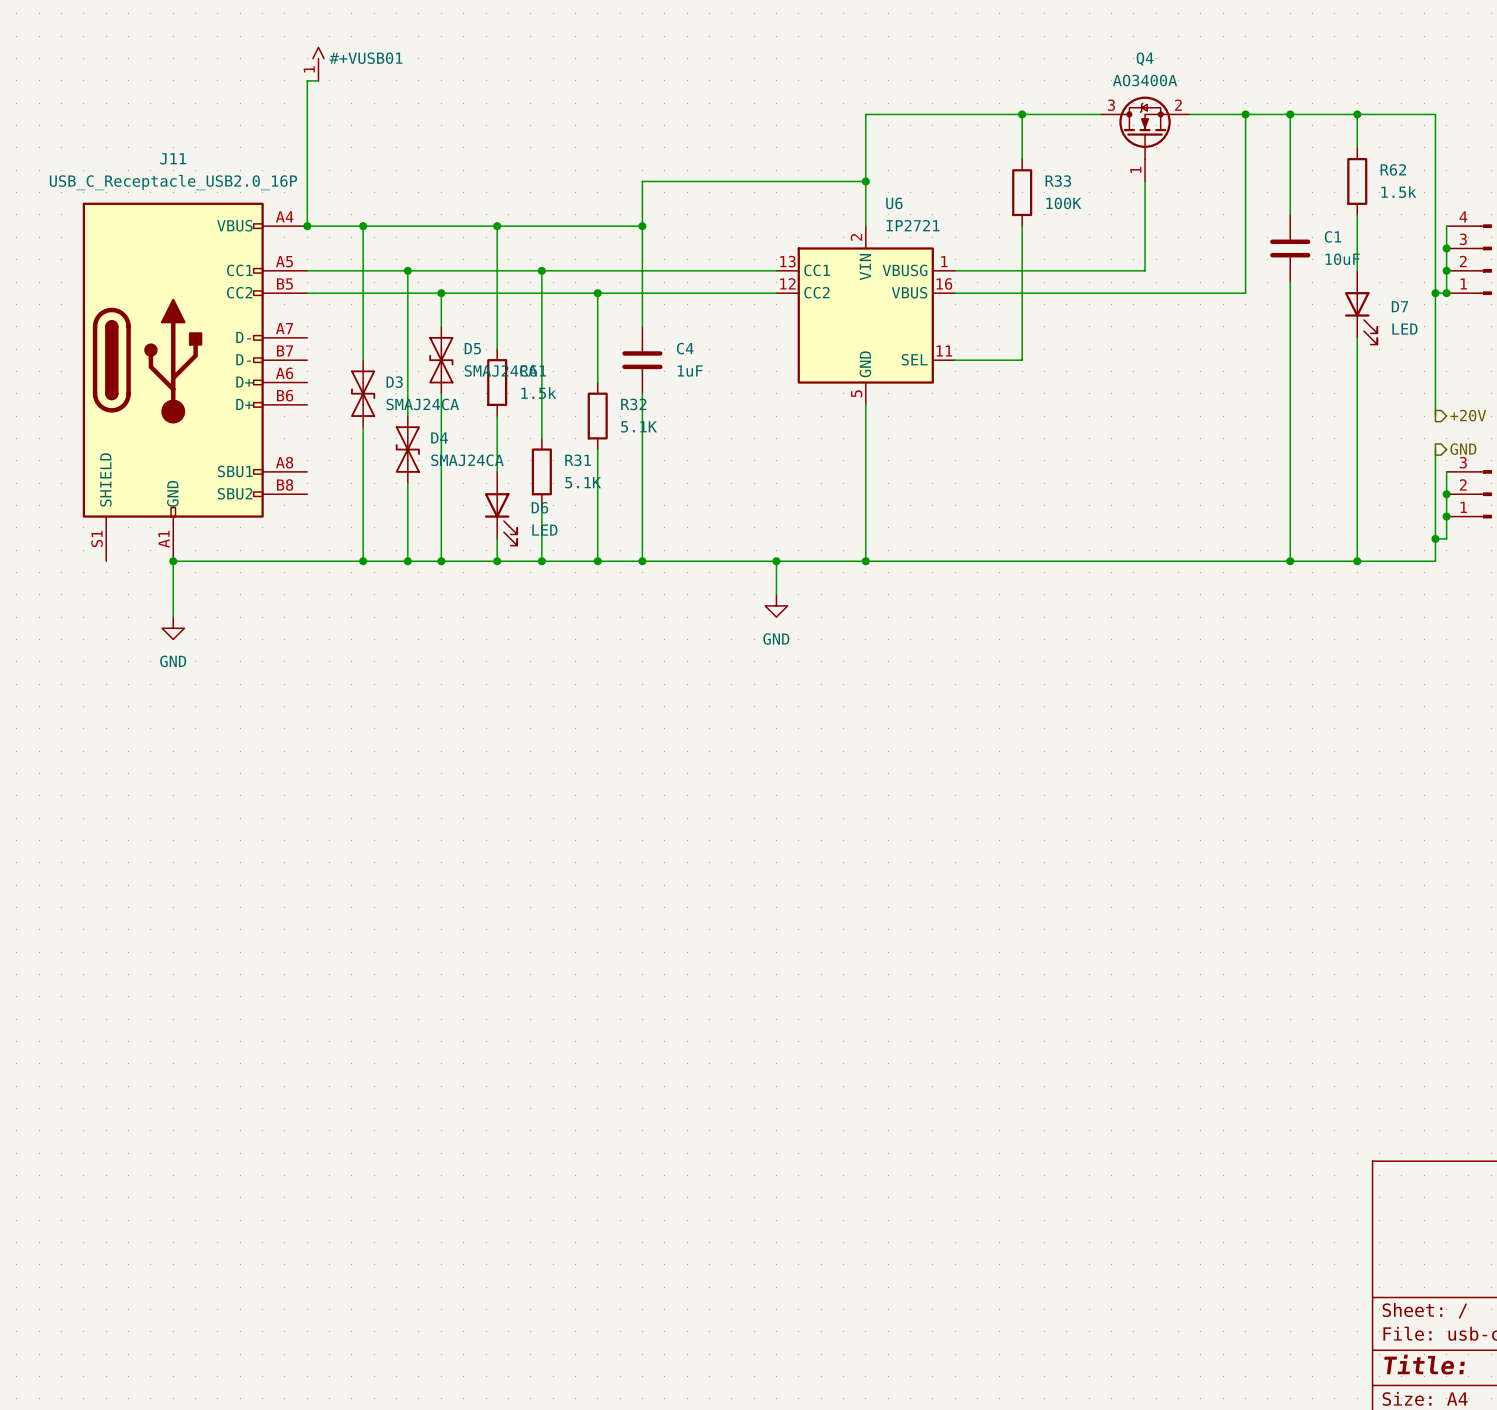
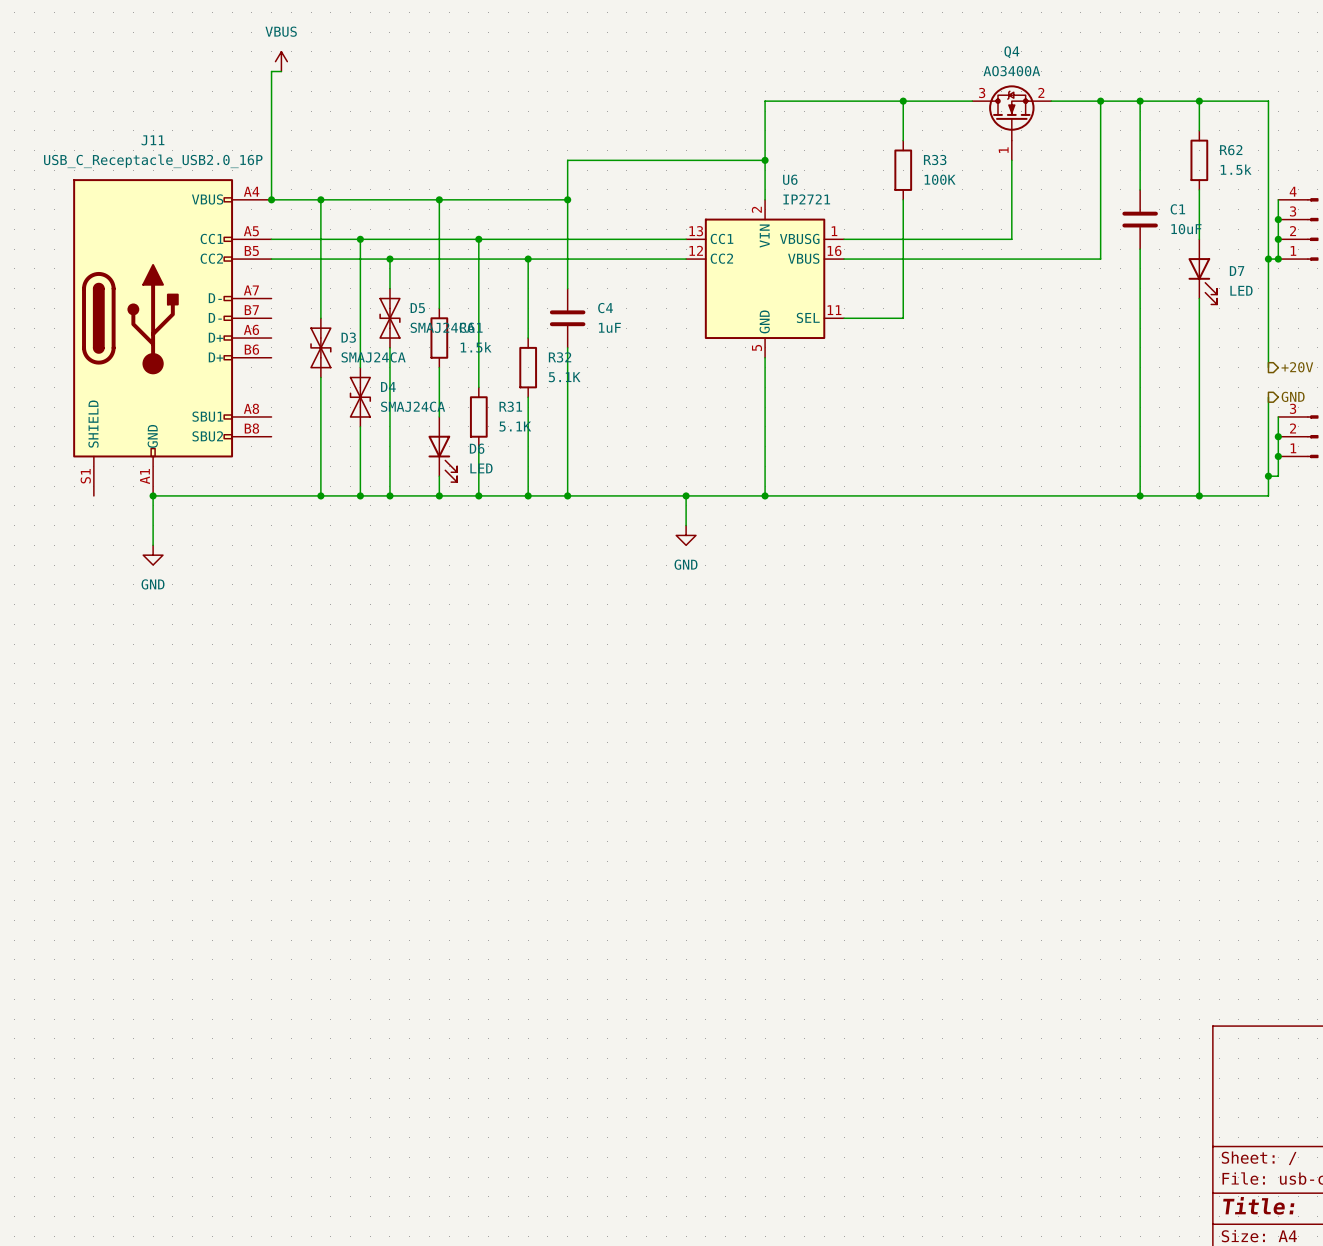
#+VUSB01 text: none -> VBUS (281, 31)
#+VUSB01 shape: [312, 47, 325, 81] -> [275, 51, 288, 72]
#+VUSB01 name: #+VUSB01 (366, 58) -> none

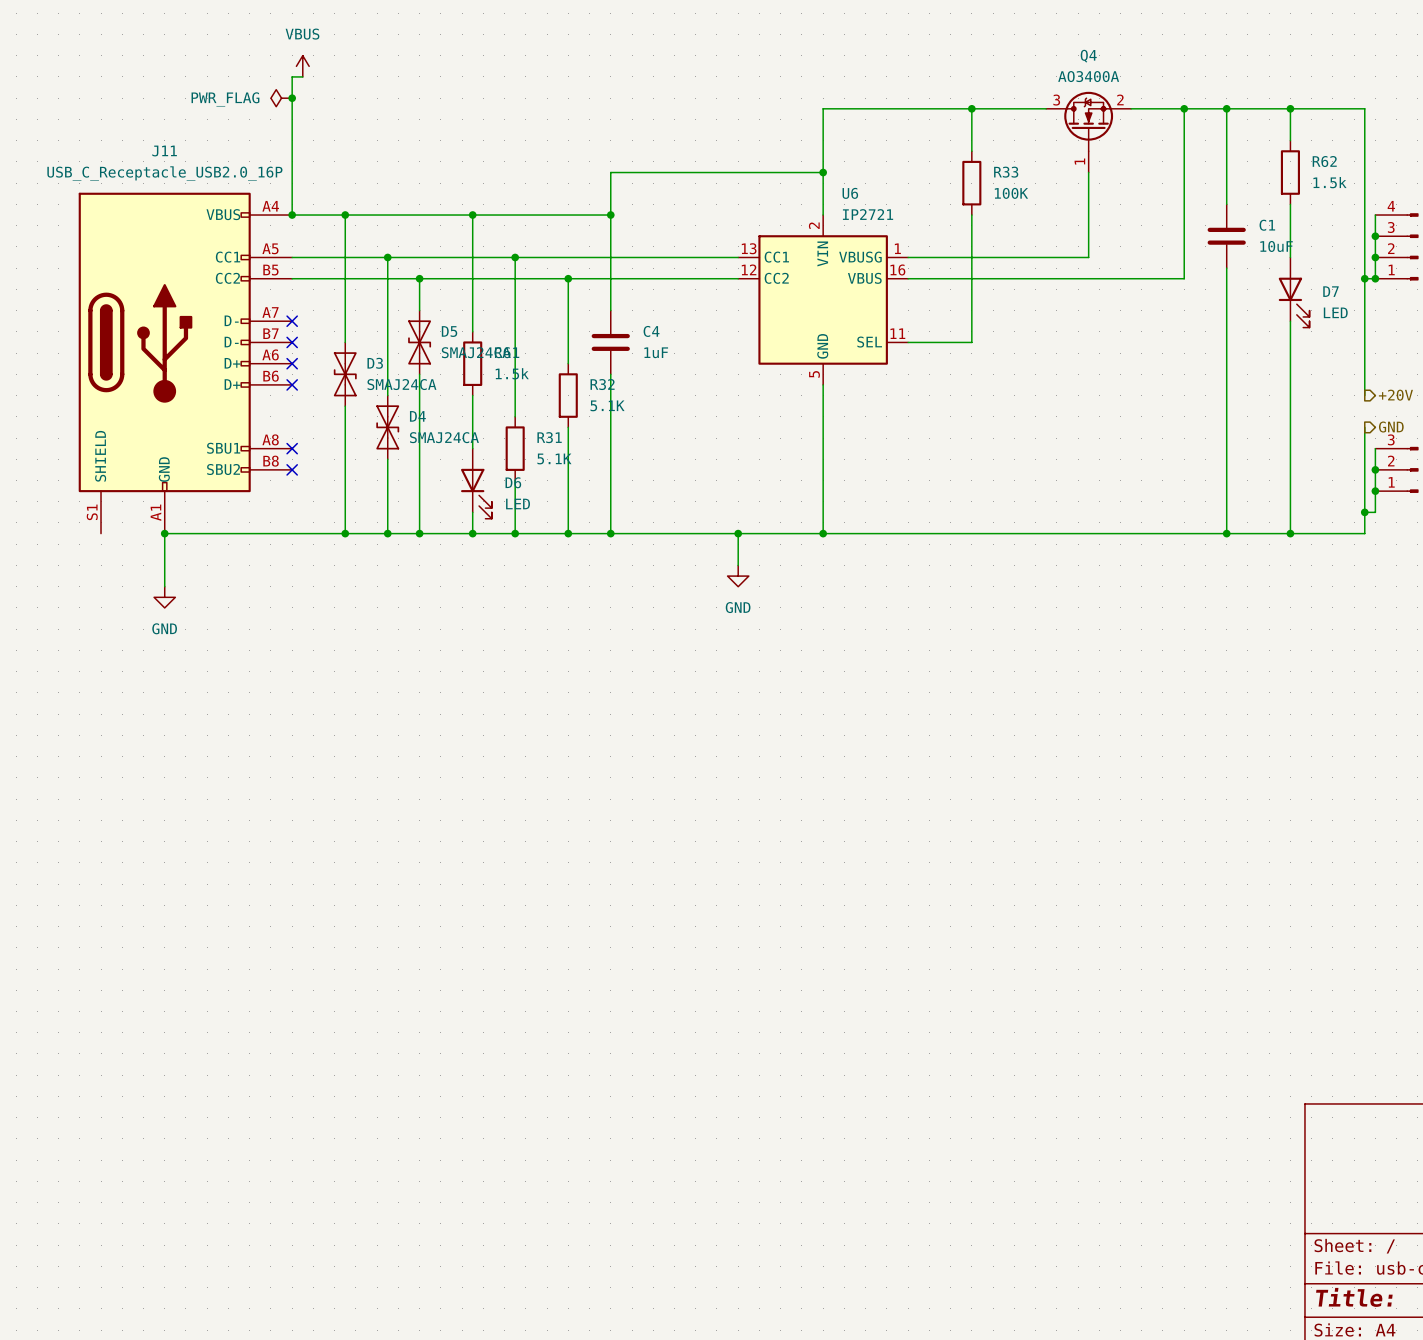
power symbol: none -> PWR_FLAG (281, 98)
junction: none -> (292, 98)
no-connect mark: none -> (292, 321)
no-connect mark: none -> (292, 342)
no-connect mark: none -> (292, 363)
no-connect mark: none -> (292, 384)
no-connect mark: none -> (292, 448)
no-connect mark: none -> (292, 469)

